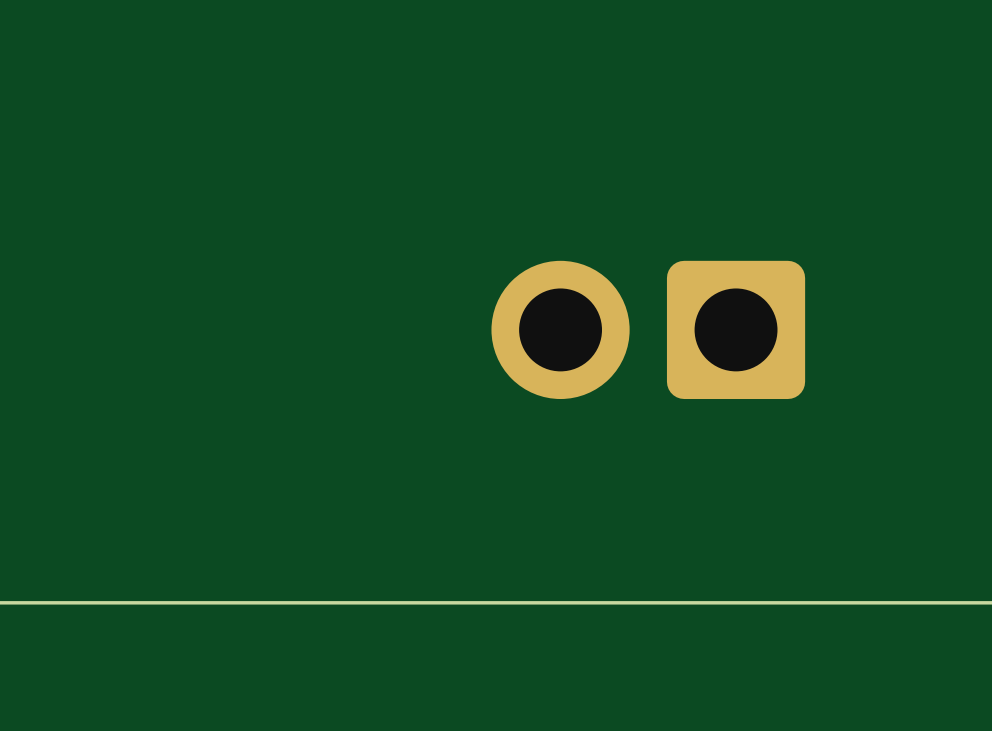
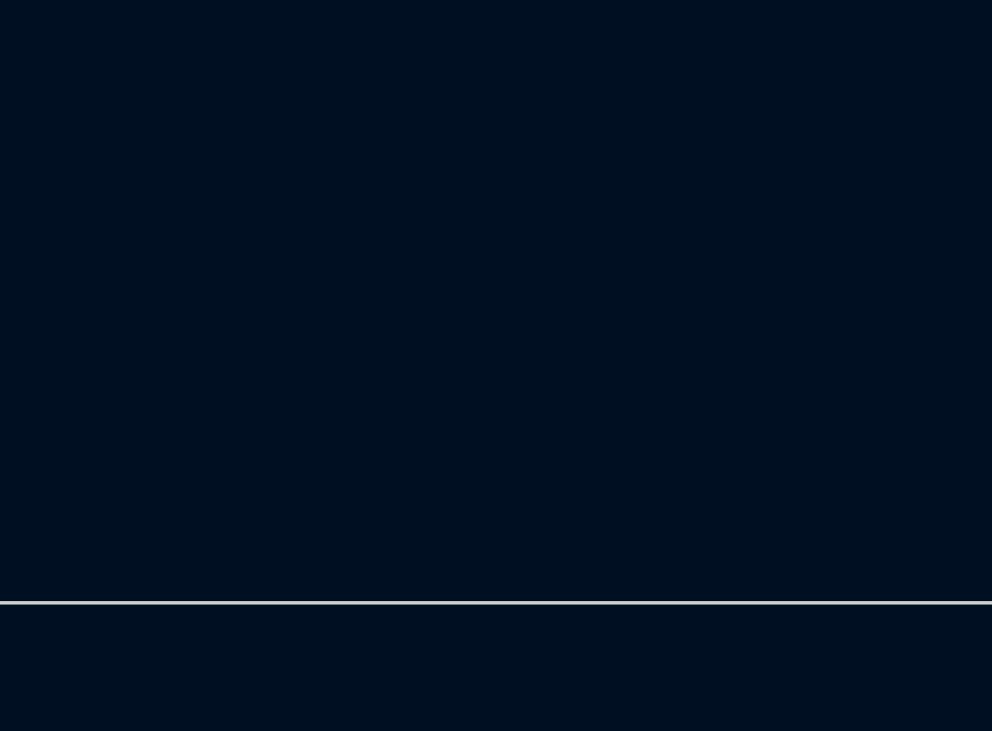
part: (648, 329) -> none

